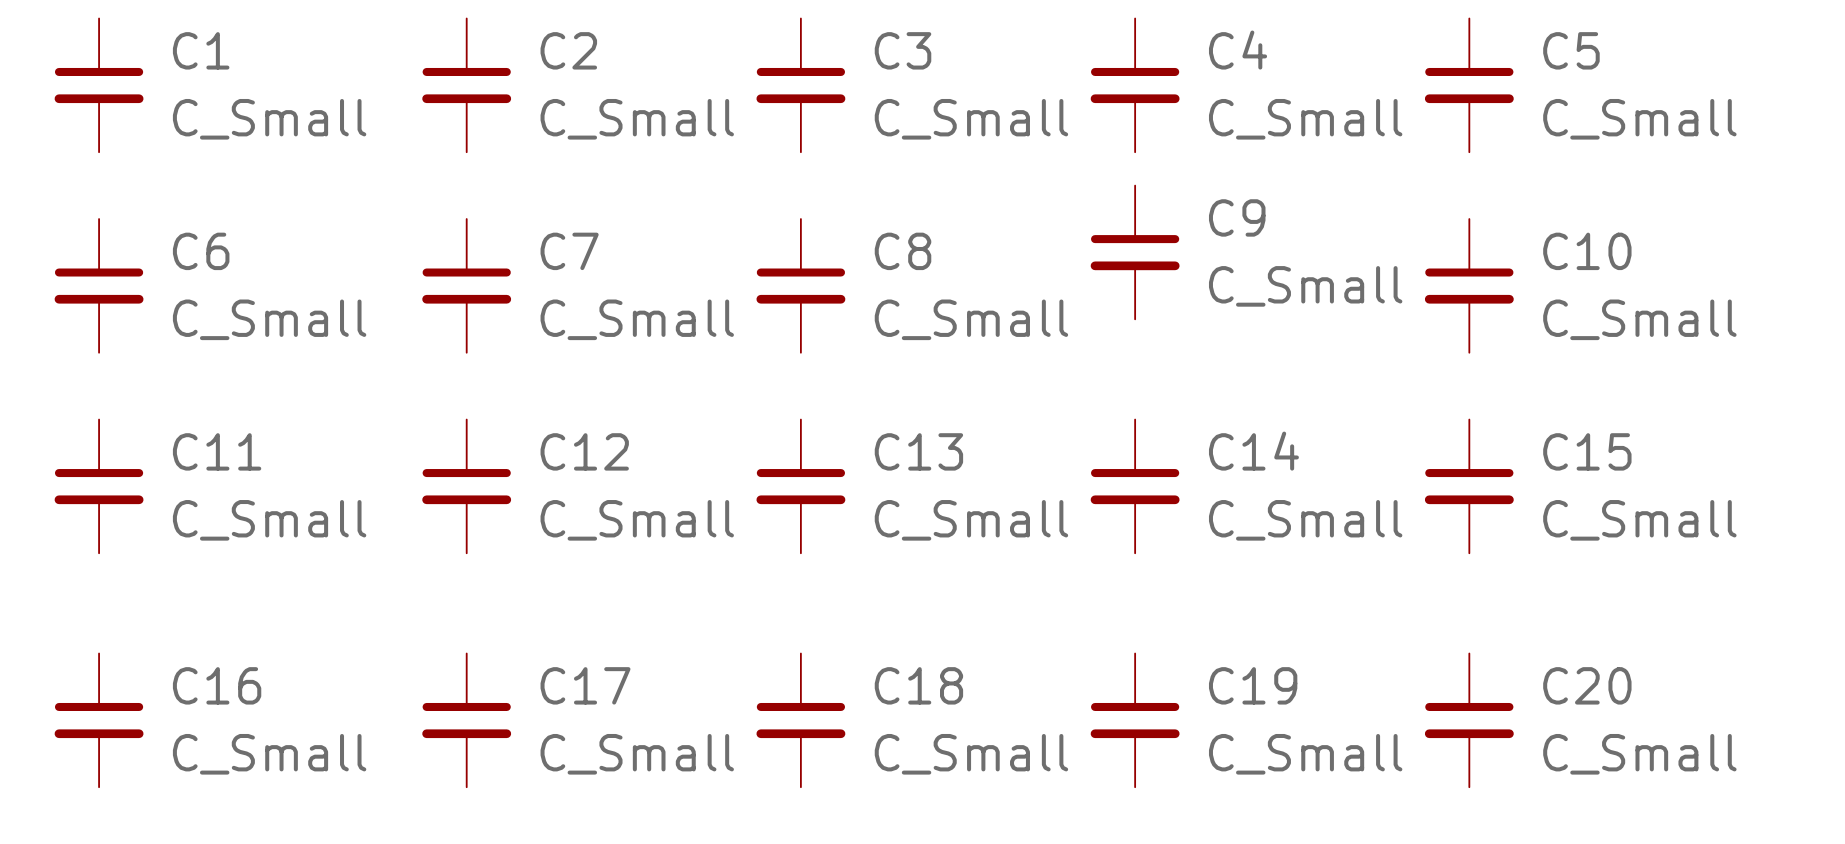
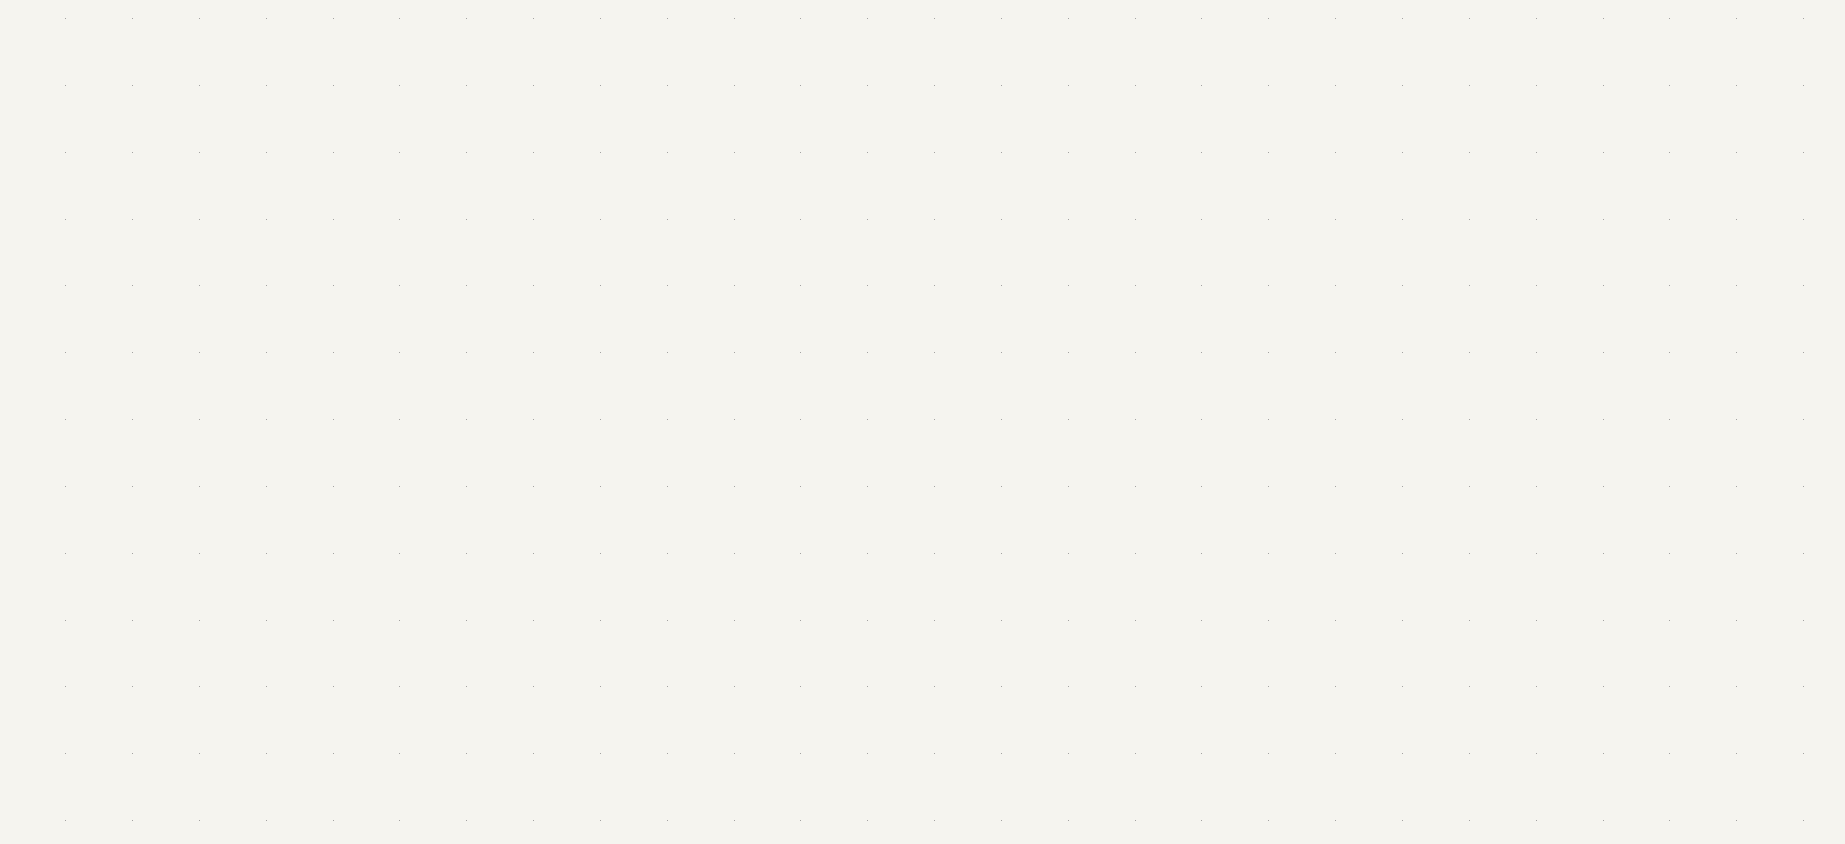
C1: C_Small (99, 85) -> none
C2: C_Small (466, 85) -> none
C3: C_Small (800, 85) -> none
C4: C_Small (1135, 85) -> none
C5: C_Small (1469, 85) -> none
C9: C_Small (1135, 252) -> none
C6: C_Small (99, 285) -> none
C7: C_Small (466, 285) -> none
C8: C_Small (800, 285) -> none
C10: C_Small (1469, 285) -> none
C11: C_Small (99, 486) -> none
C12: C_Small (466, 486) -> none
C13: C_Small (800, 486) -> none
C14: C_Small (1135, 486) -> none
C15: C_Small (1469, 486) -> none
C16: C_Small (99, 720) -> none
C17: C_Small (466, 720) -> none
C18: C_Small (800, 720) -> none
C19: C_Small (1135, 720) -> none
C20: C_Small (1469, 720) -> none

